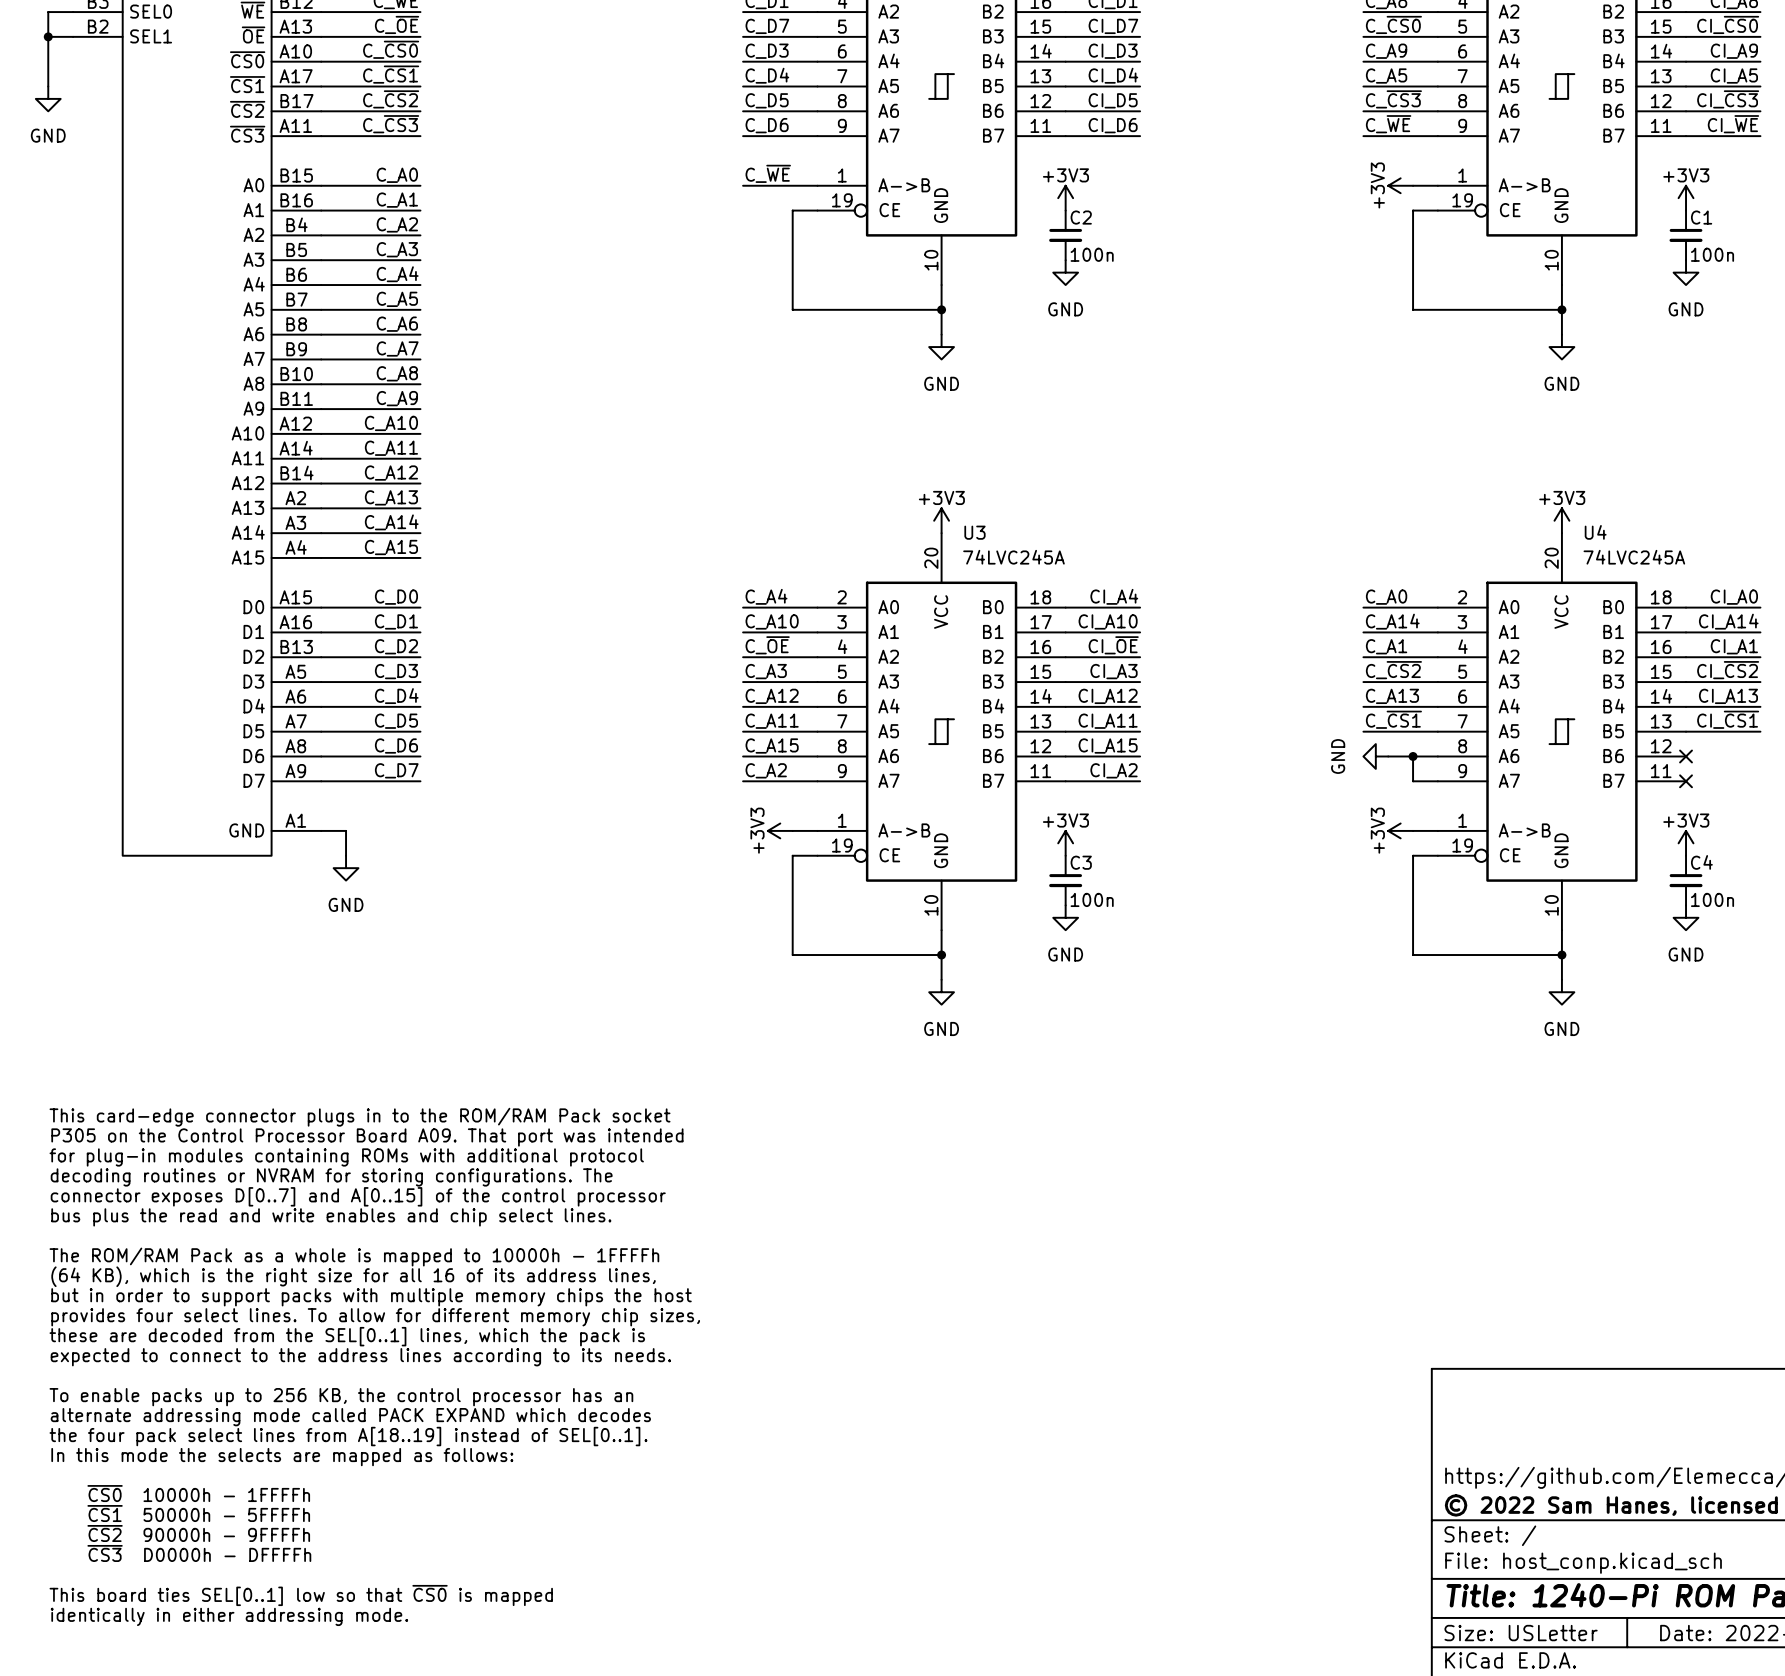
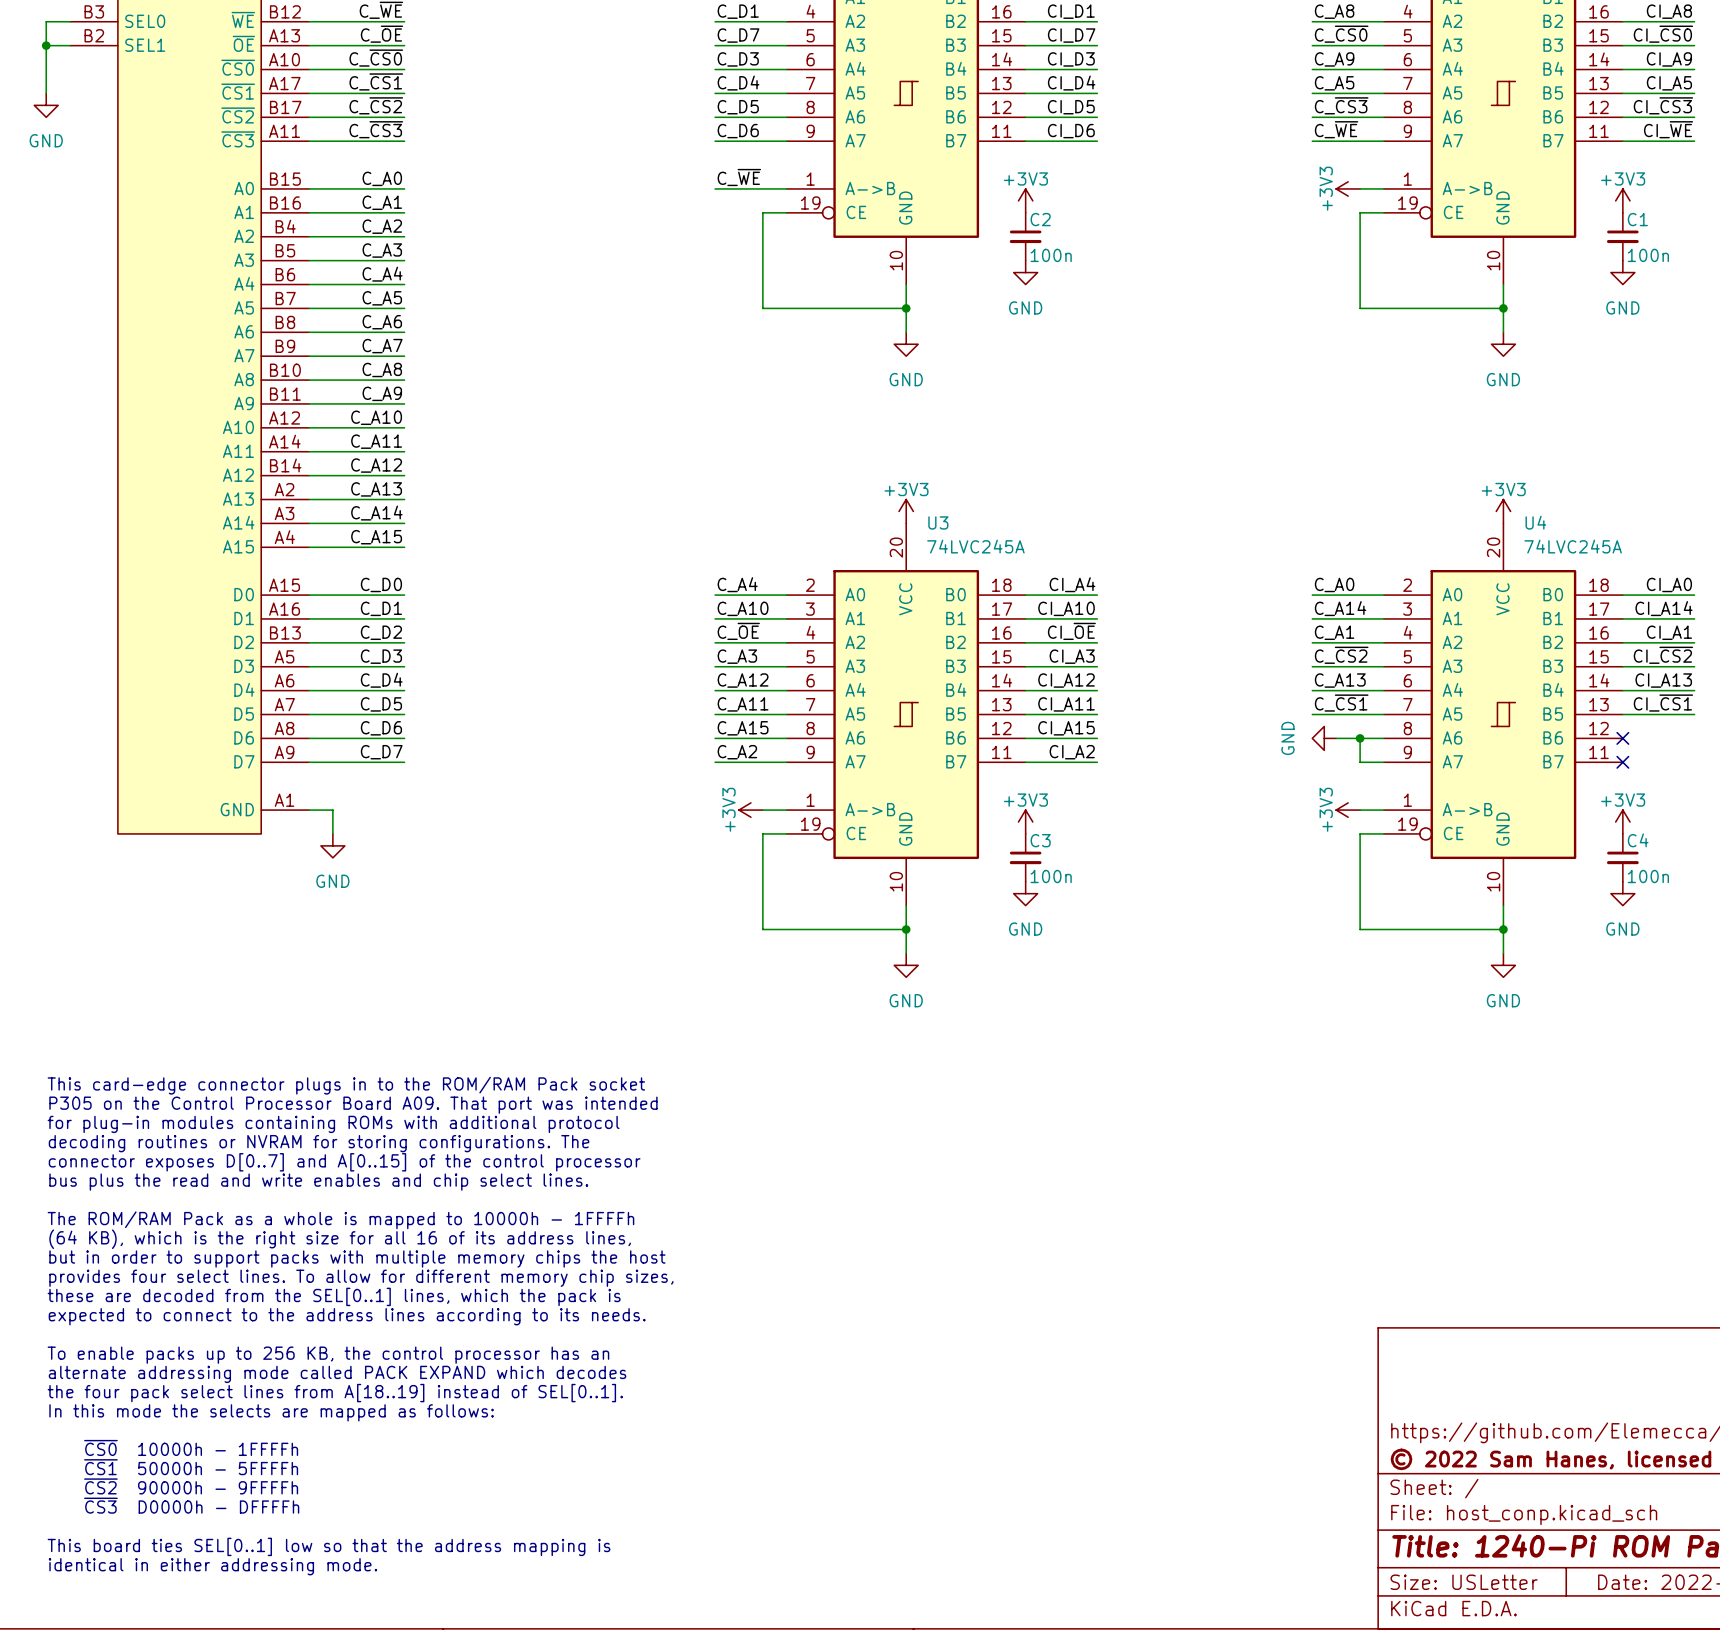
text: This board ties SEL[0..1] low so that ~{CS0} is mapped (301, 1595) -> This board ties SEL[0..1] low so that the address mapping is (329, 1546)
text: identically in either addressing mode. (229, 1616) -> identical in either addressing mode. (212, 1566)

